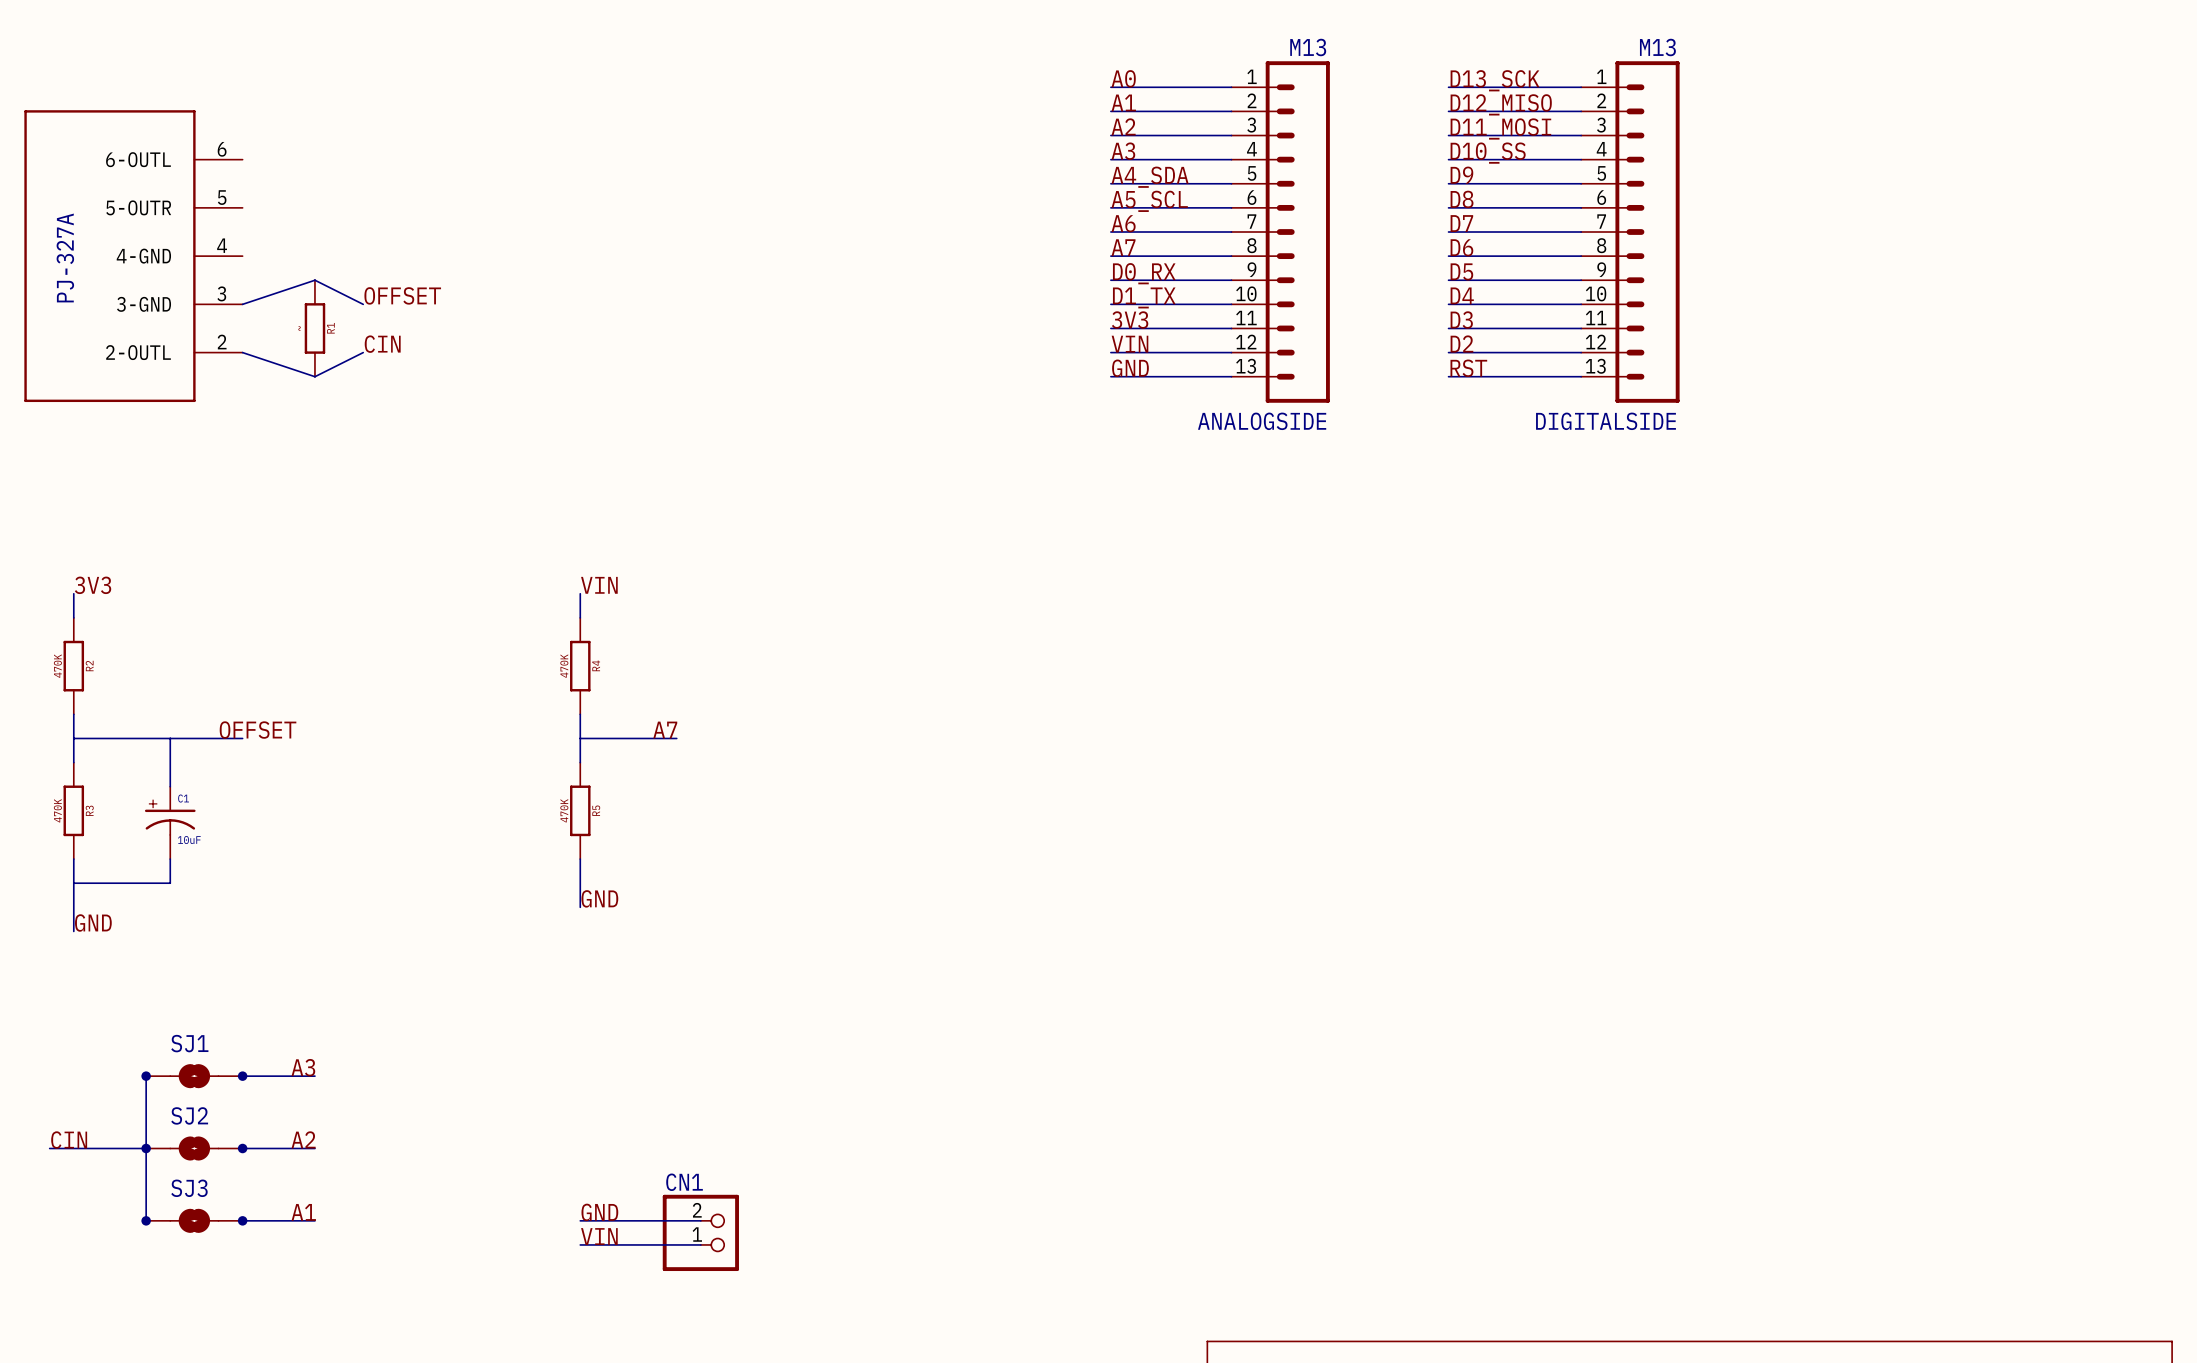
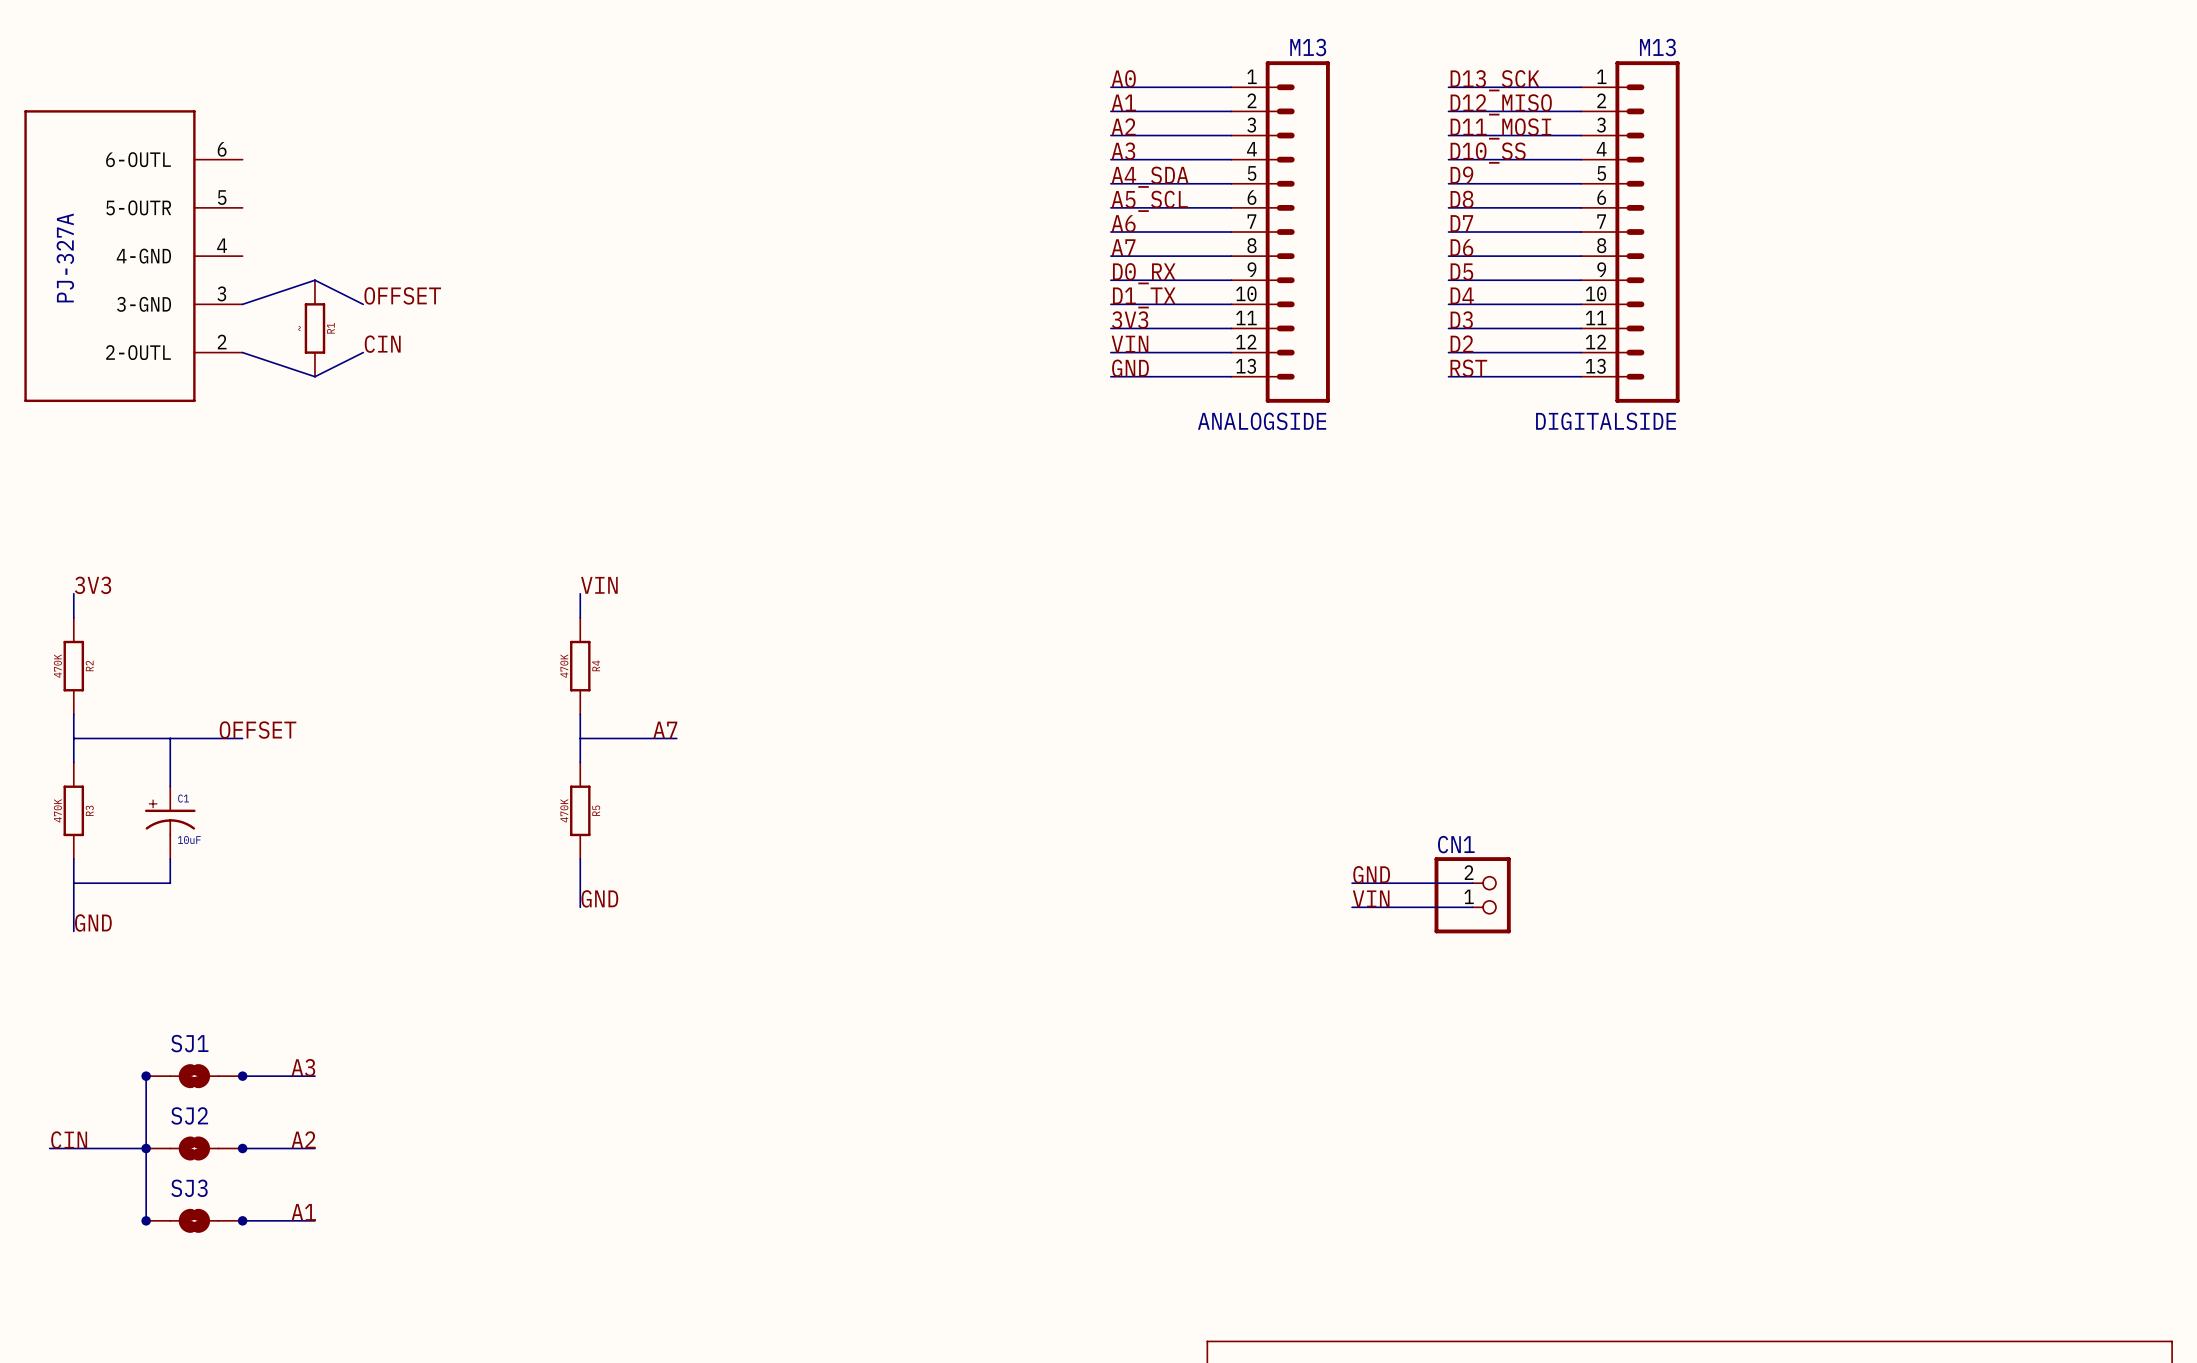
label: none -> GND (1371, 874)
wire: none -> (1352, 883) (1472, 883)
label: none -> VIN (1371, 898)
wire: none -> (1352, 907) (1472, 907)
label: GND (599, 1212) -> none
wire: (580, 1220) (700, 1220) -> none
CN1 position: (700, 1232) -> (1472, 895)
label: VIN (599, 1236) -> none
wire: (580, 1244) (700, 1244) -> none

